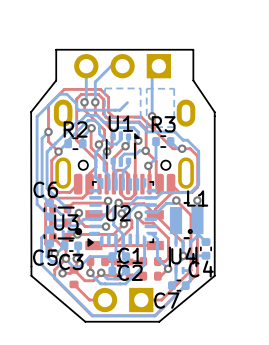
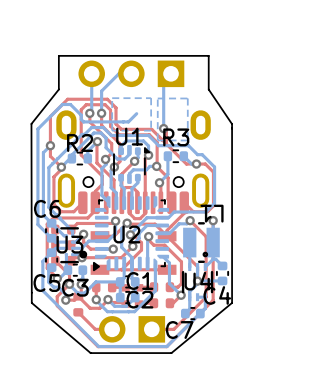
L1 name rotation: 0° (197, 198) -> 180° (212, 213)

